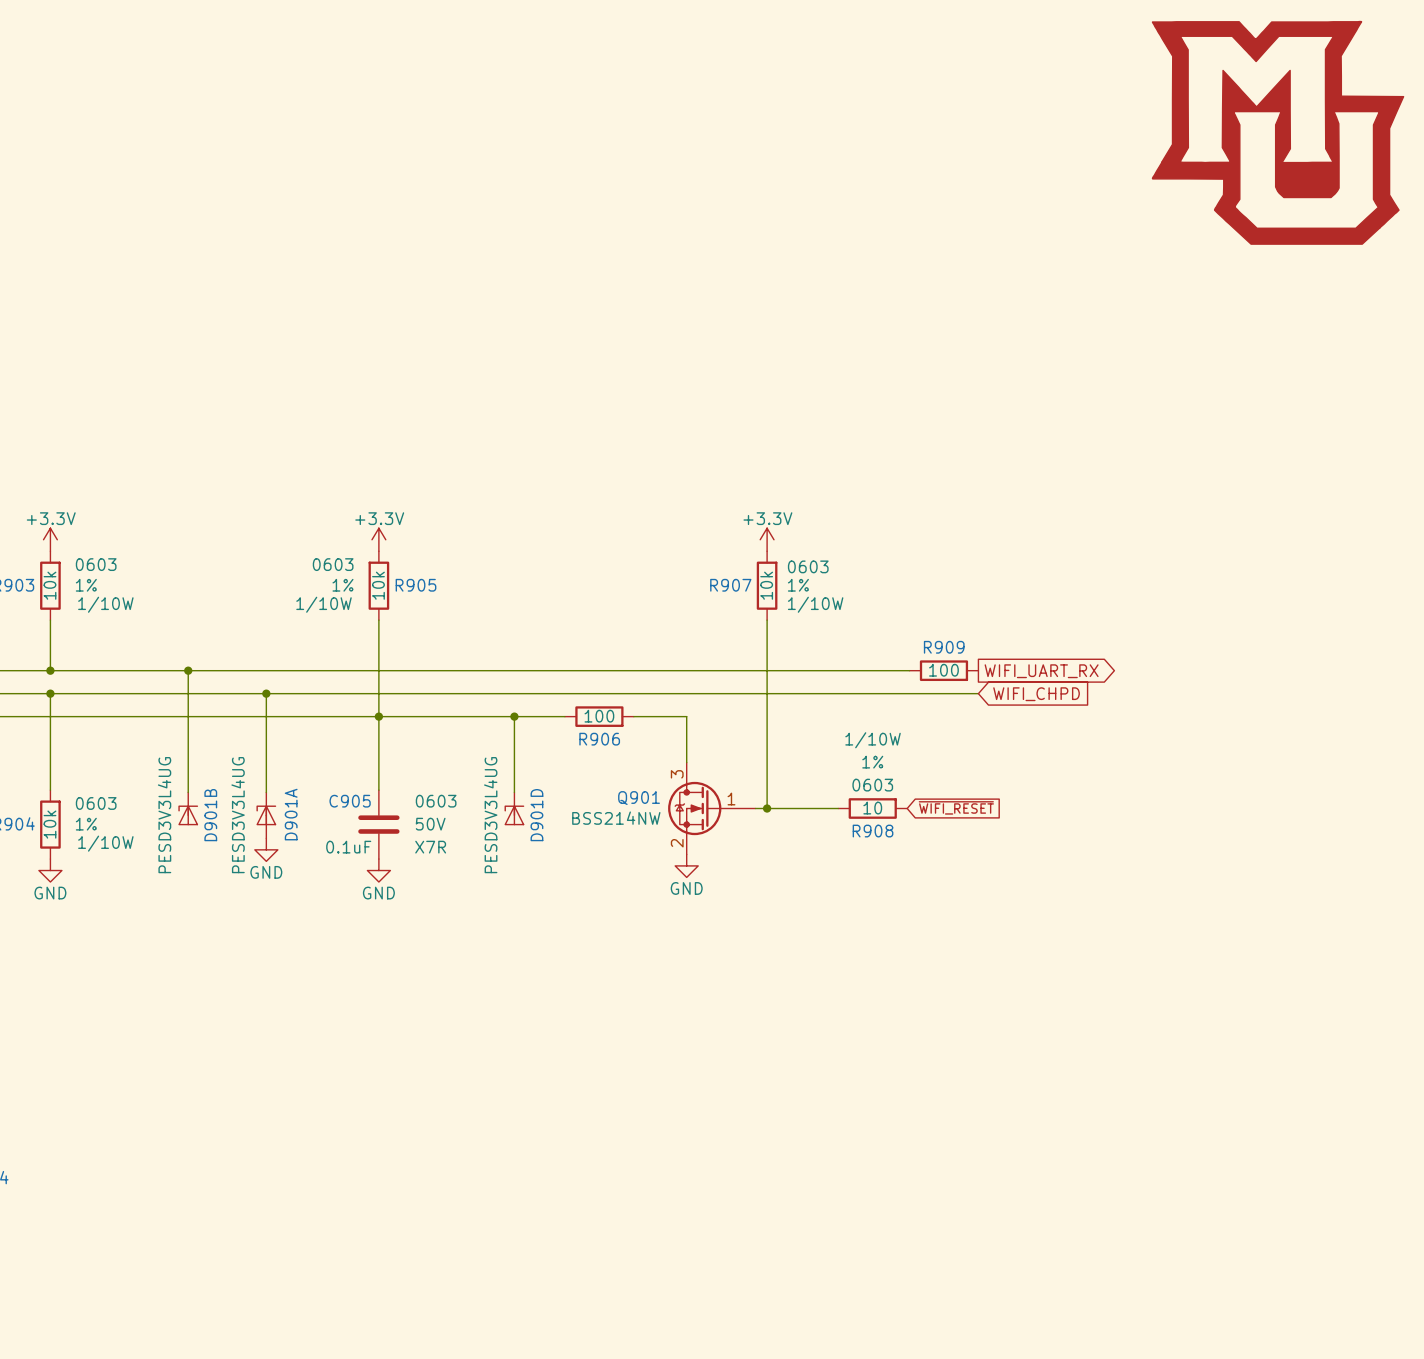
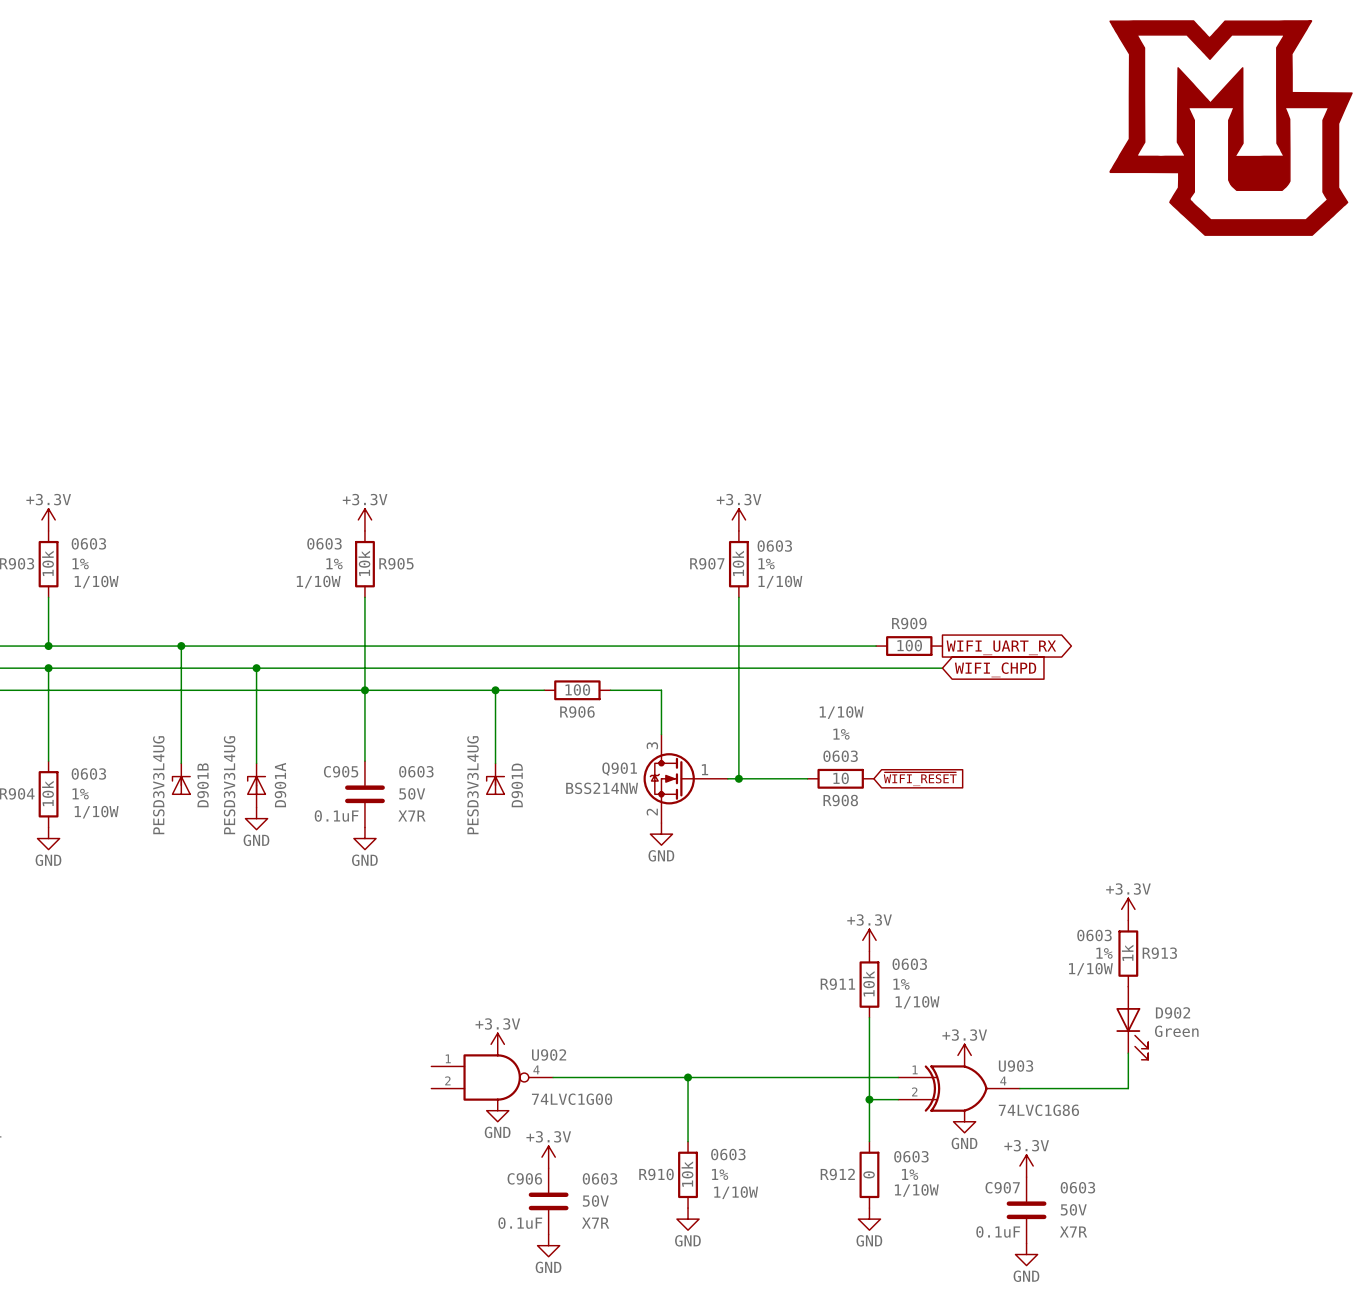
power symbol: none -> +3.3V (1128, 909)
power symbol: none -> +3.3V (869, 940)
R913: none -> 1k (1128, 953)
R911: none -> 10k (869, 984)
wire: none -> (869, 1017) (869, 1141)
D902: none -> Green (1132, 1023)
power symbol: none -> +3.3V (497, 1044)
wire: none -> (1128, 1053) (1128, 1088) (1019, 1088)
power symbol: none -> +3.3V (964, 1055)
U902: none -> 74LVC1G00 (492, 1077)
wire: none -> (553, 1077) (898, 1077)
wire: none -> (688, 1077) (688, 1141)
junction: none -> (688, 1077)
U903: none -> 74LVC1G86 (959, 1088)
wire: none -> (869, 1099) (898, 1099)
junction: none -> (869, 1099)
power symbol: none -> GND (497, 1110)
power symbol: none -> GND (964, 1121)
power symbol: none -> +3.3V (548, 1157)
power symbol: none -> +3.3V (1026, 1166)
R910: none -> 10k (688, 1174)
R912: none -> 0 (869, 1174)
C906: none -> 0.1uF (548, 1201)
C907: none -> 0.1uF (1026, 1210)
power symbol: none -> GND (688, 1219)
power symbol: none -> GND (869, 1219)
power symbol: none -> GND (548, 1245)
power symbol: none -> GND (1026, 1254)

